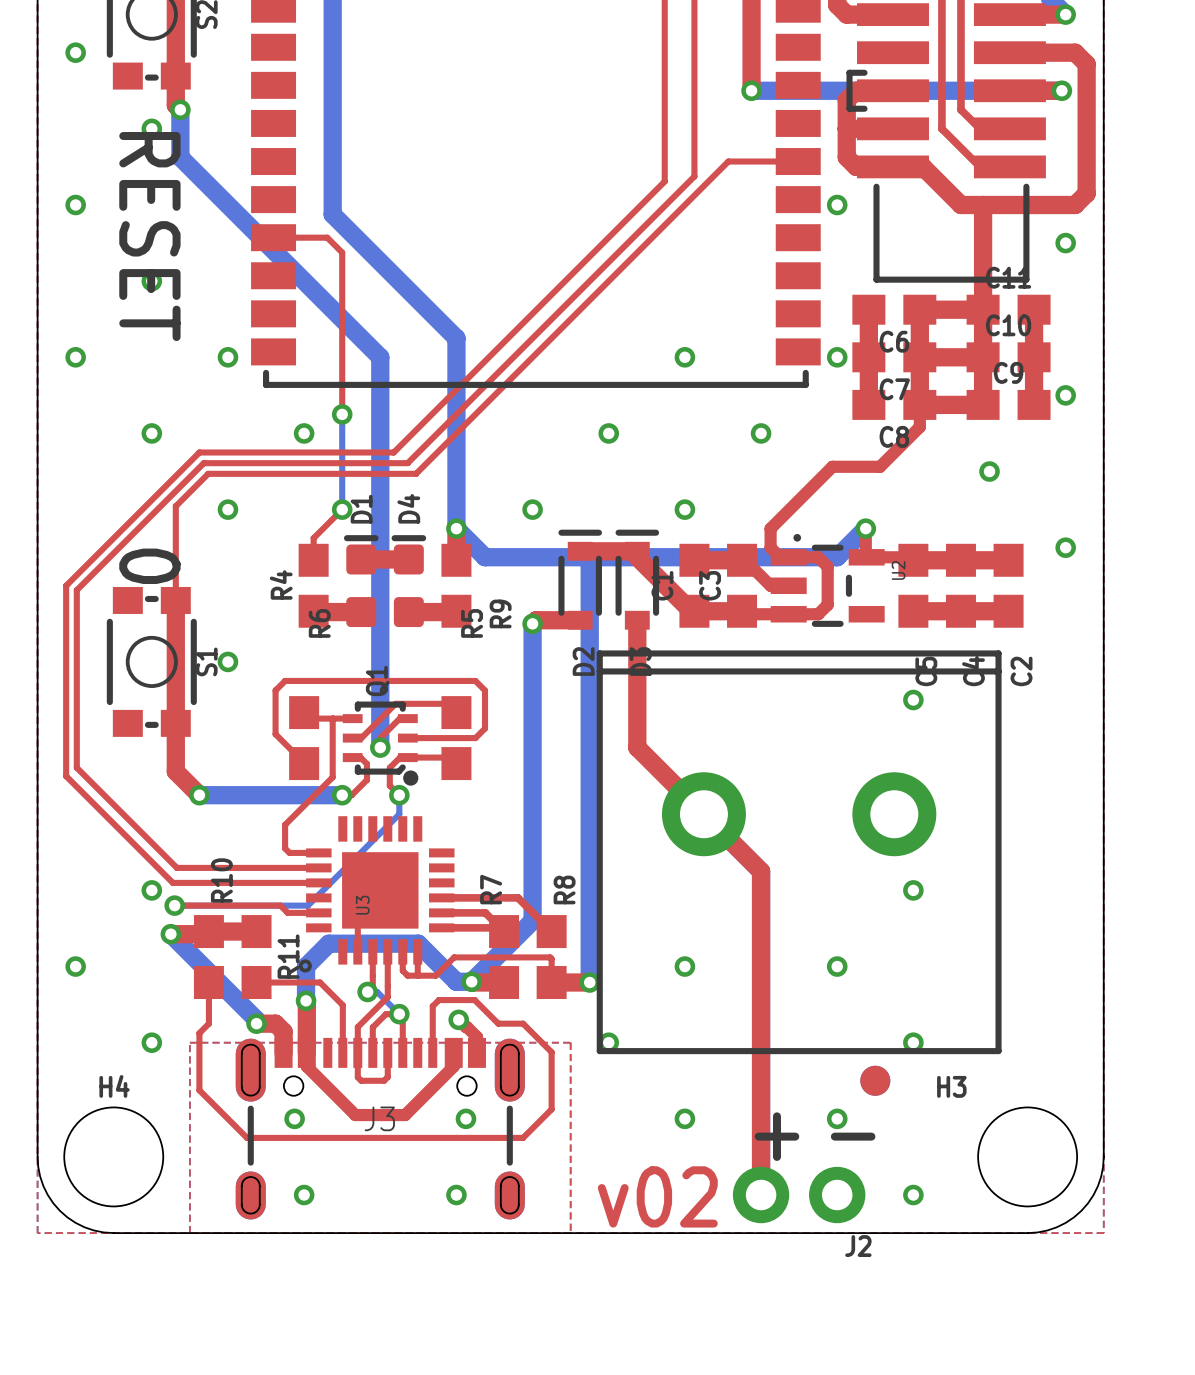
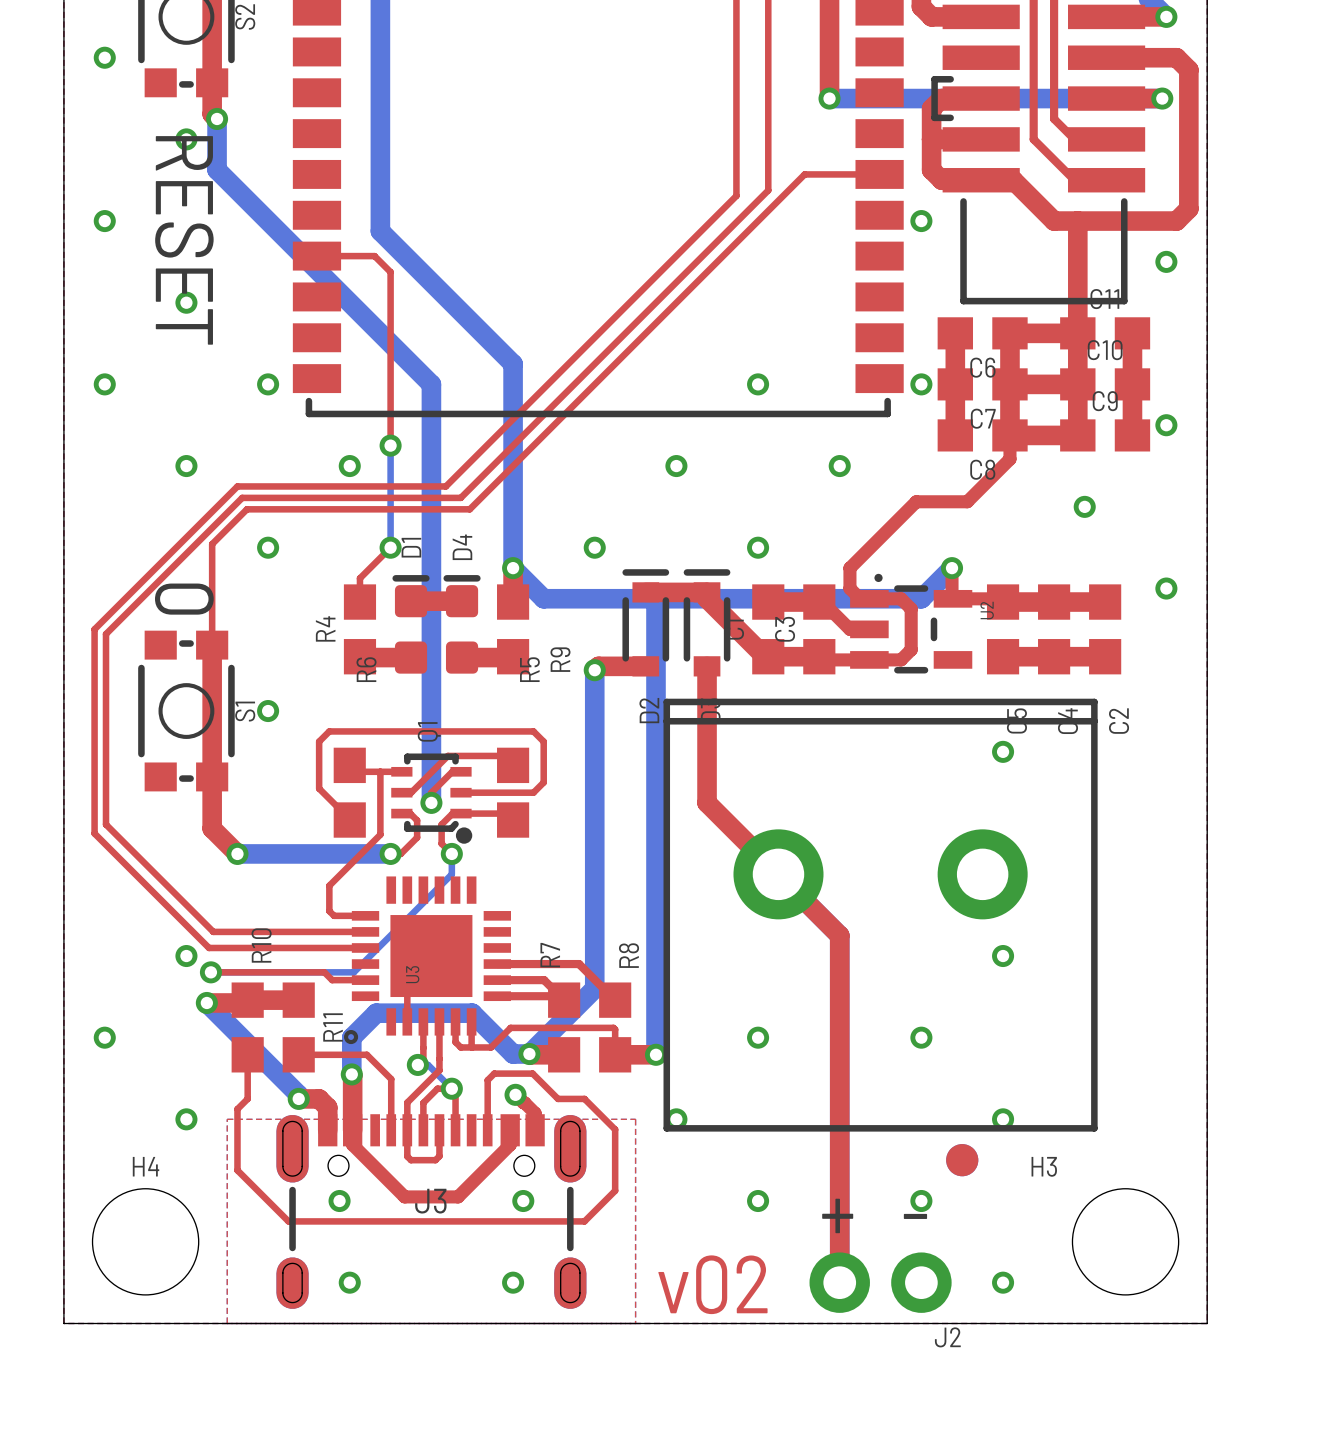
board edge: (37, 1156) (43, 1186) (59, 1210) (84, 1227) (113, 1233) -> (63, 1241) (63, 1323) (145, 1323)
board edge: (1103, 1156) (1097, 1186) (1081, 1210) (1056, 1227) (1027, 1233) -> (1207, 1241) (1207, 1323) (1125, 1323)

